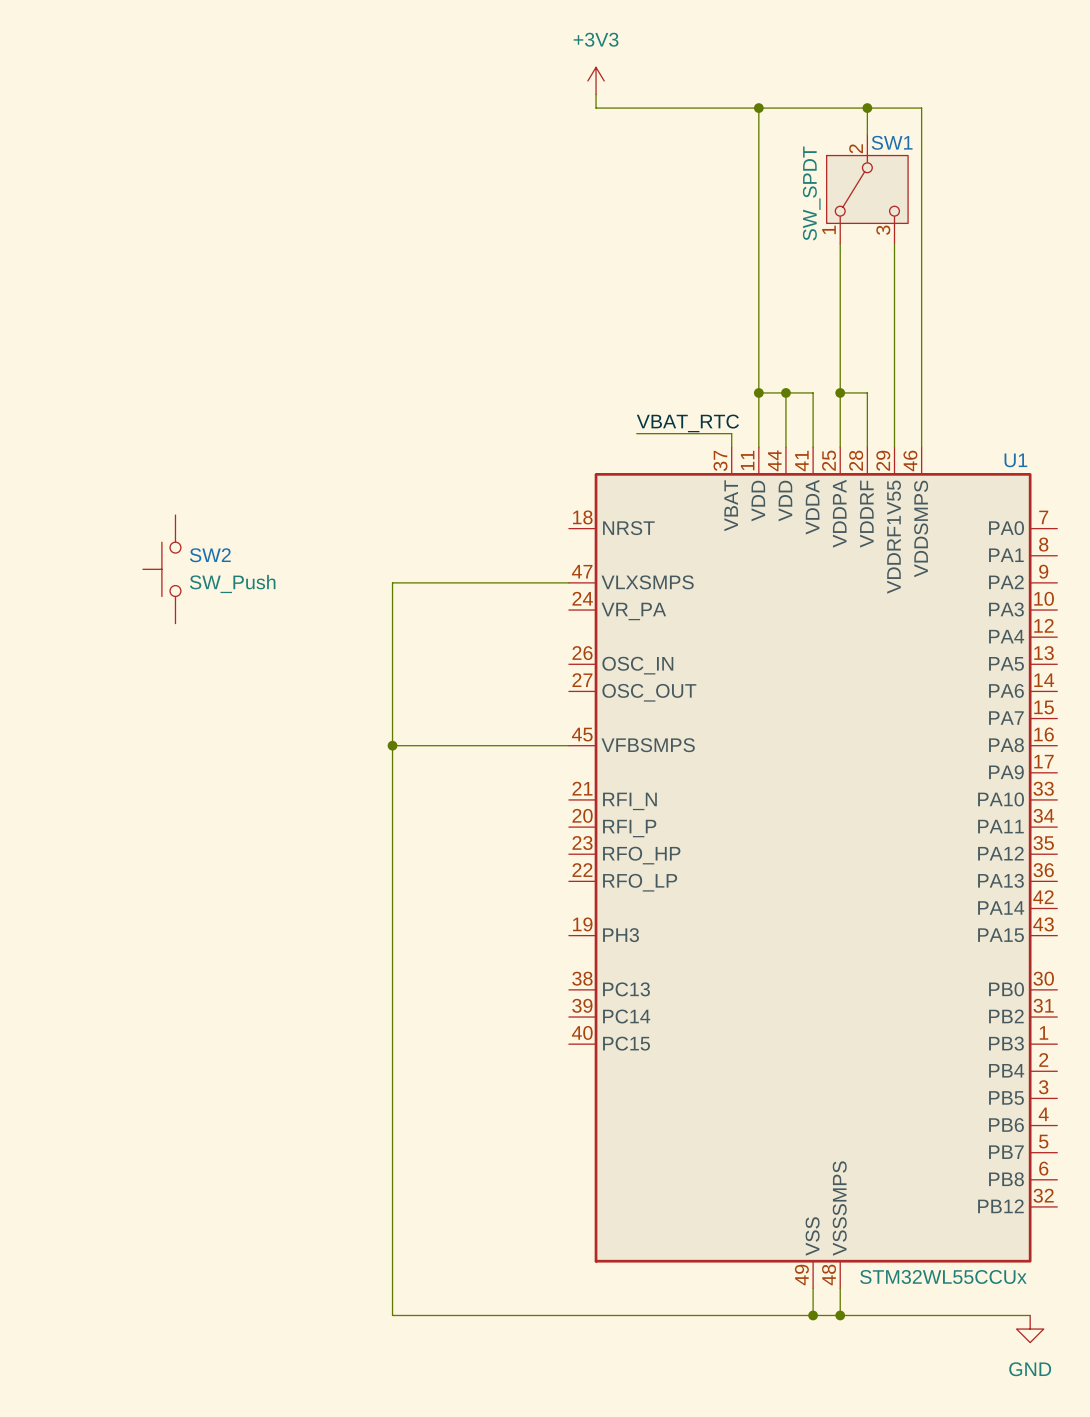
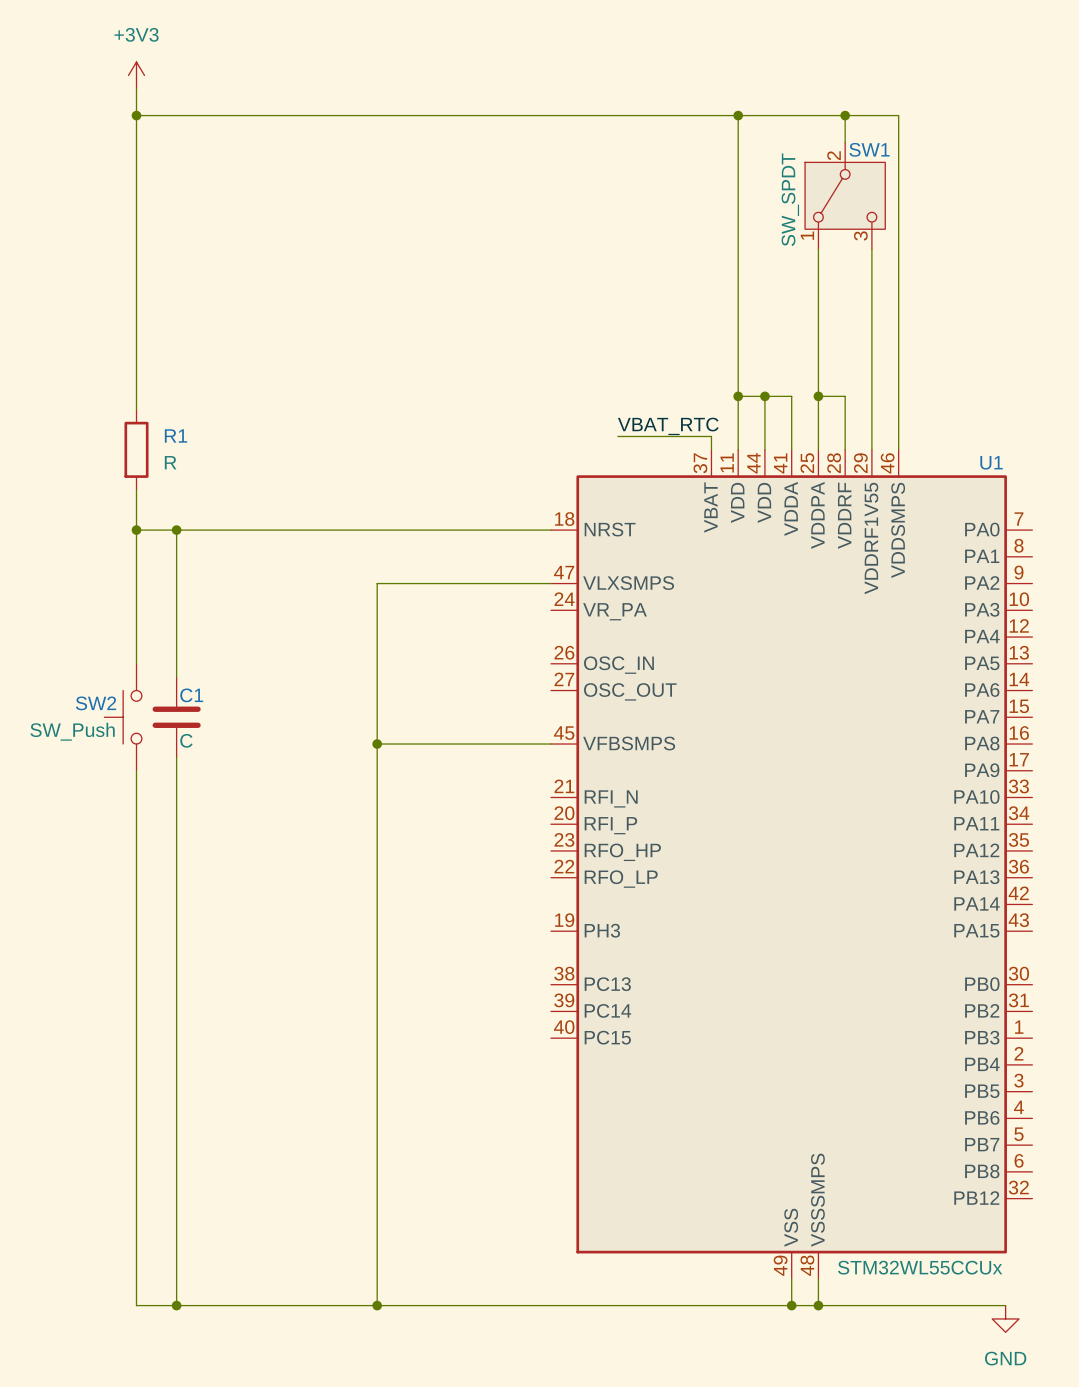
power symbol: none -> +3V3 (136, 75)
wire: none -> (136, 88) (136, 409)
power symbol: +3V3 (596, 80) -> none
wire: (596, 94) (596, 108) -> (136, 115) (577, 115)
junction: none -> (136, 115)
R1: none -> R (136, 449)
wire: none -> (136, 489) (136, 663)
wire: none -> (136, 530) (551, 530)
junction: none -> (136, 530)
wire: none -> (176, 530) (176, 677)
junction: none -> (176, 530)
SW2 name position: SW2 (210, 555) -> SW2 (96, 703)
SW2 position: (161, 569) -> (123, 717)
SW2 value position: SW_Push (232, 583) -> SW_Push (72, 731)
C1: none -> C (176, 717)
wire: none -> (176, 757) (176, 1305)
wire: none -> (136, 770) (136, 1305) (377, 1305)
junction: none -> (176, 1305)
junction: none -> (377, 1305)

